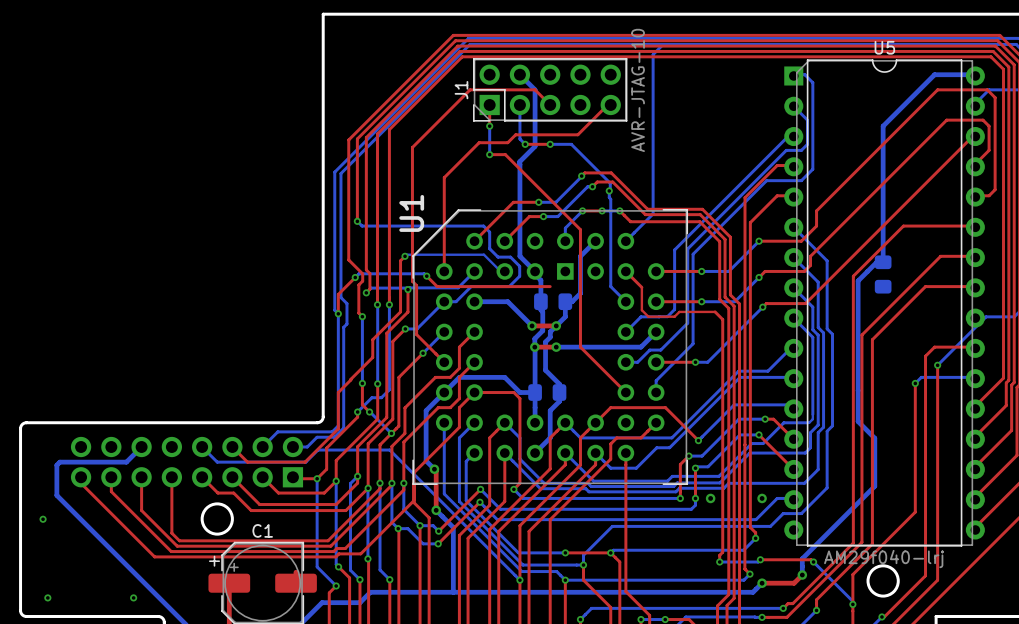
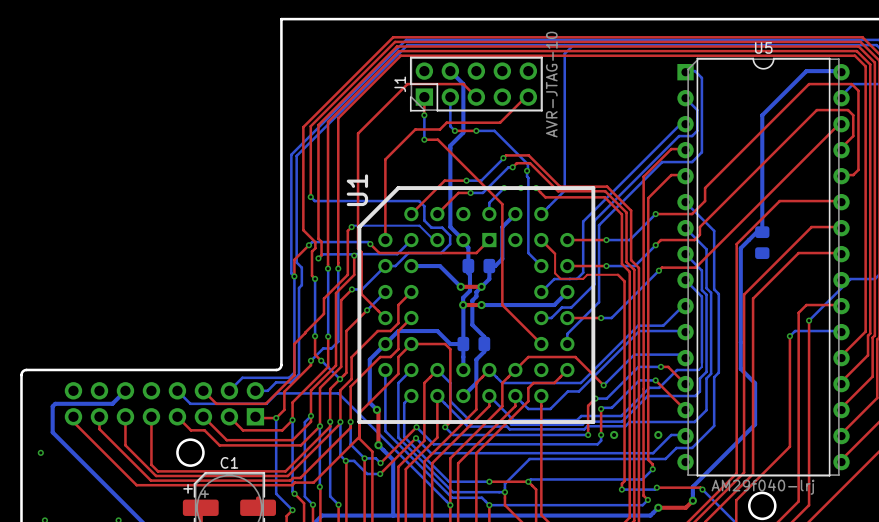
U1 footprint: [412, 209, 688, 485] -> [357, 186, 596, 424]
top track: none -> (489, 240) (476, 253)

